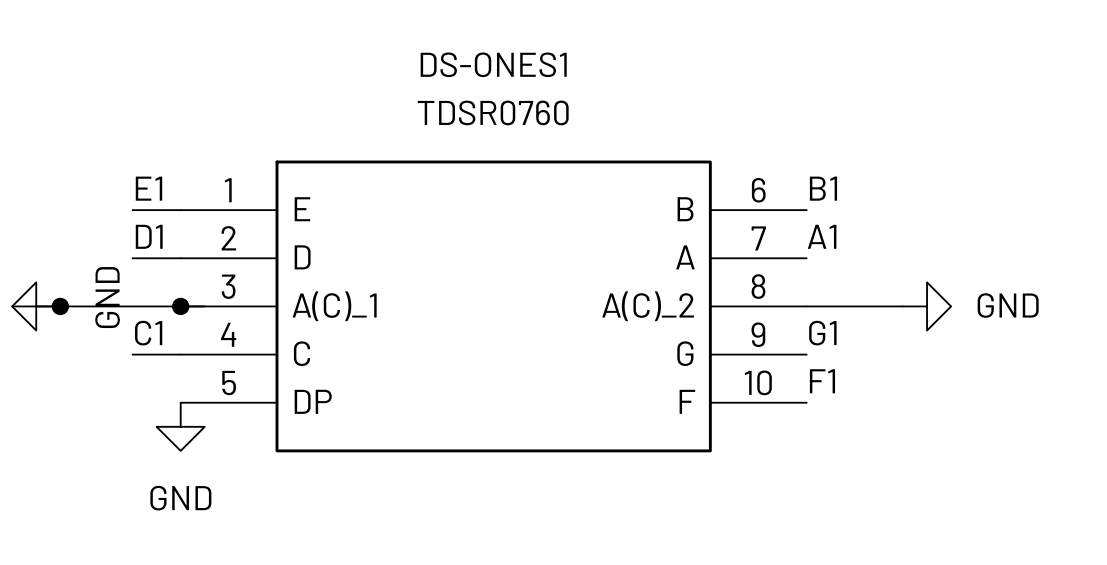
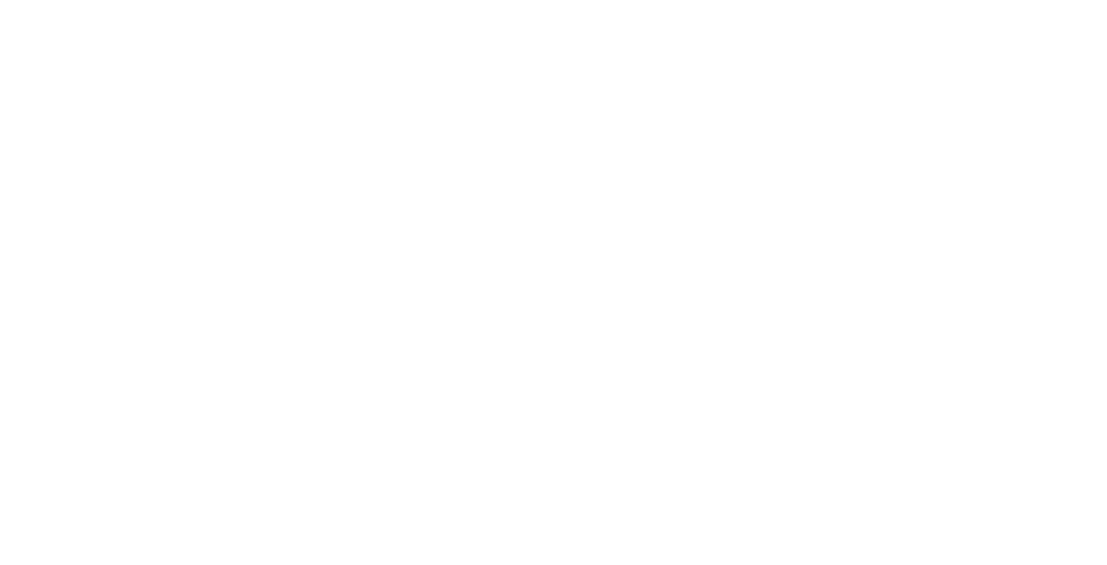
label: E1 (148, 188) -> none
label: B1 (823, 188) -> none
wire: (132, 210) (180, 210) -> none
label: D1 (149, 236) -> none
label: A1 (822, 236) -> none
wire: (132, 258) (180, 258) -> none
wire: (12, 306) (204, 306) -> none
power symbol: GND (36, 306) -> none
junction: (60, 306) -> none
junction: (180, 306) -> none
DS-ONES1: TDSR0760 (493, 306) -> none
wire: (806, 306) (902, 306) -> none
power symbol: GND (927, 306) -> none
label: C1 (148, 333) -> none
label: G1 (822, 333) -> none
wire: (132, 354) (180, 354) -> none
label: F1 (822, 381) -> none
power symbol: GND (180, 426) -> none

